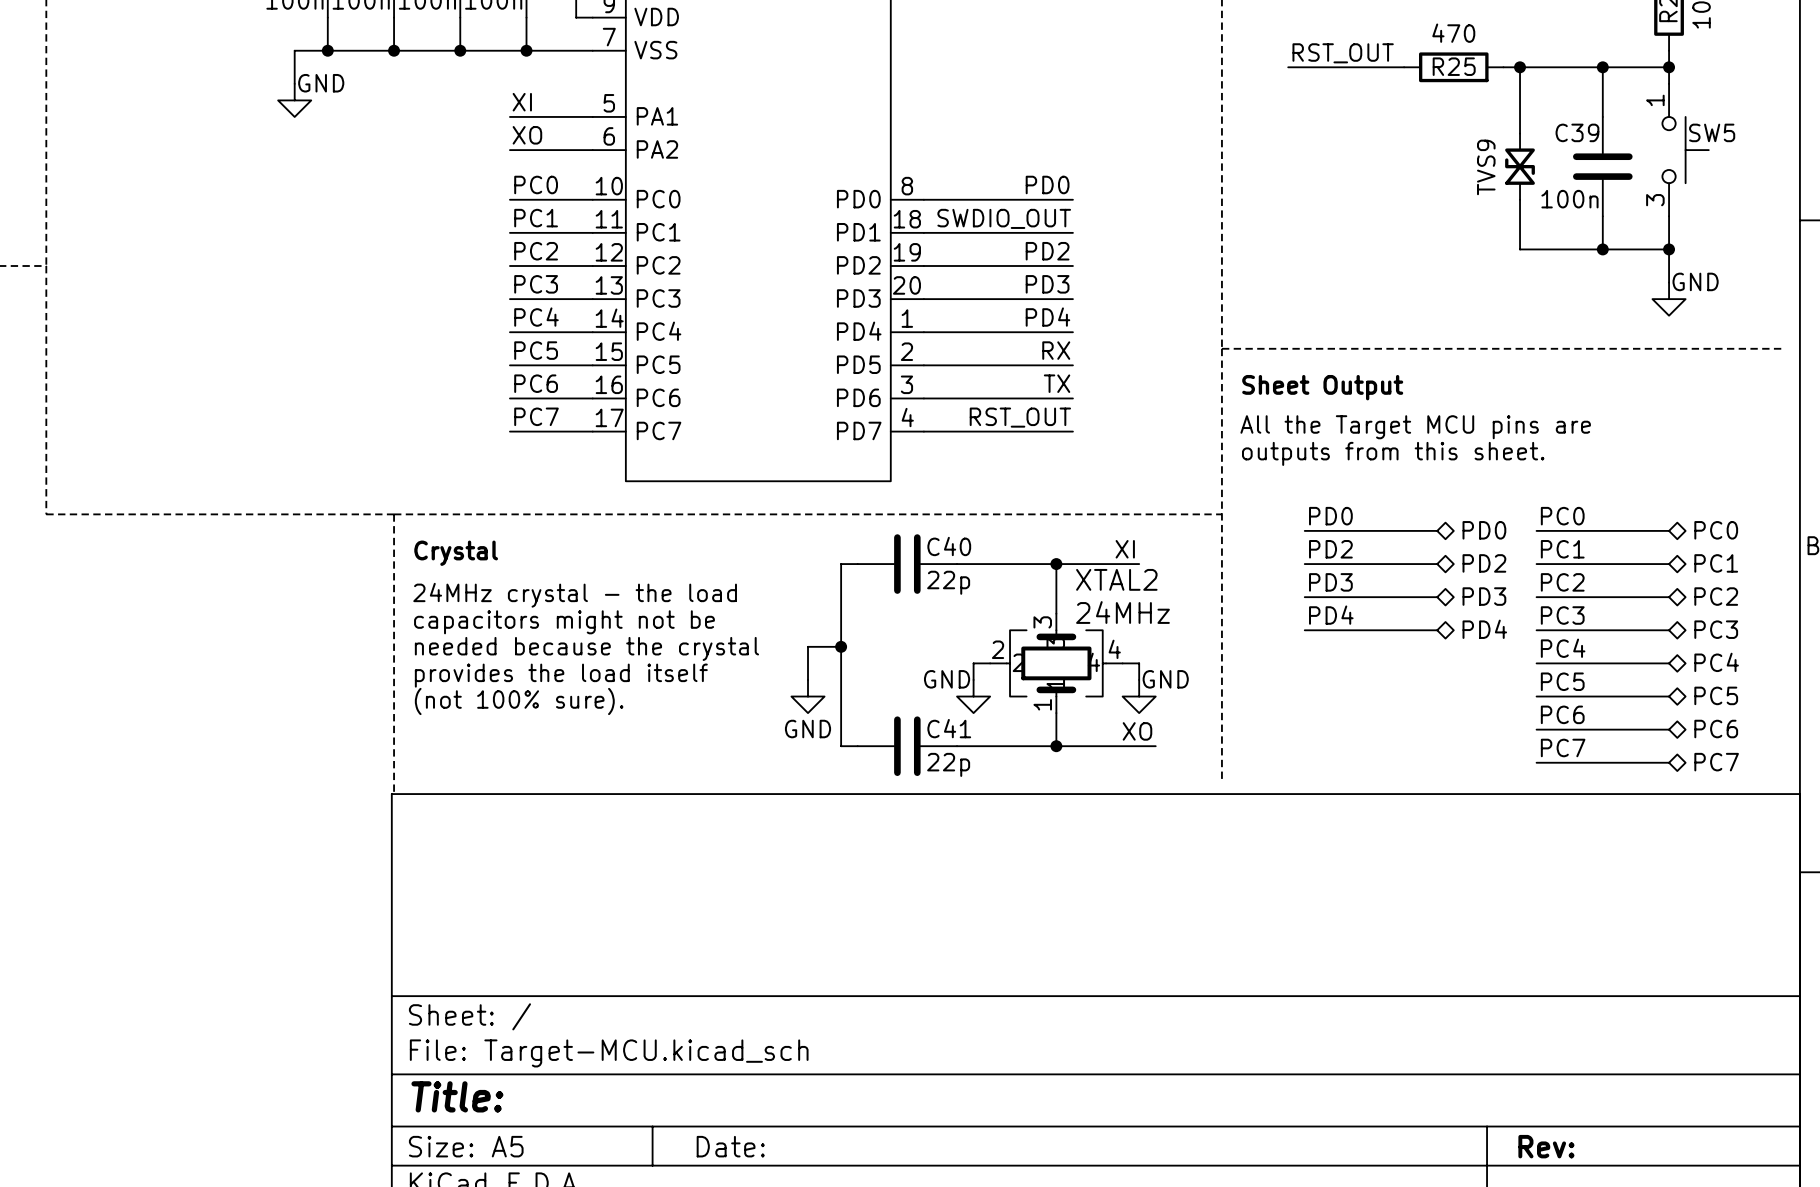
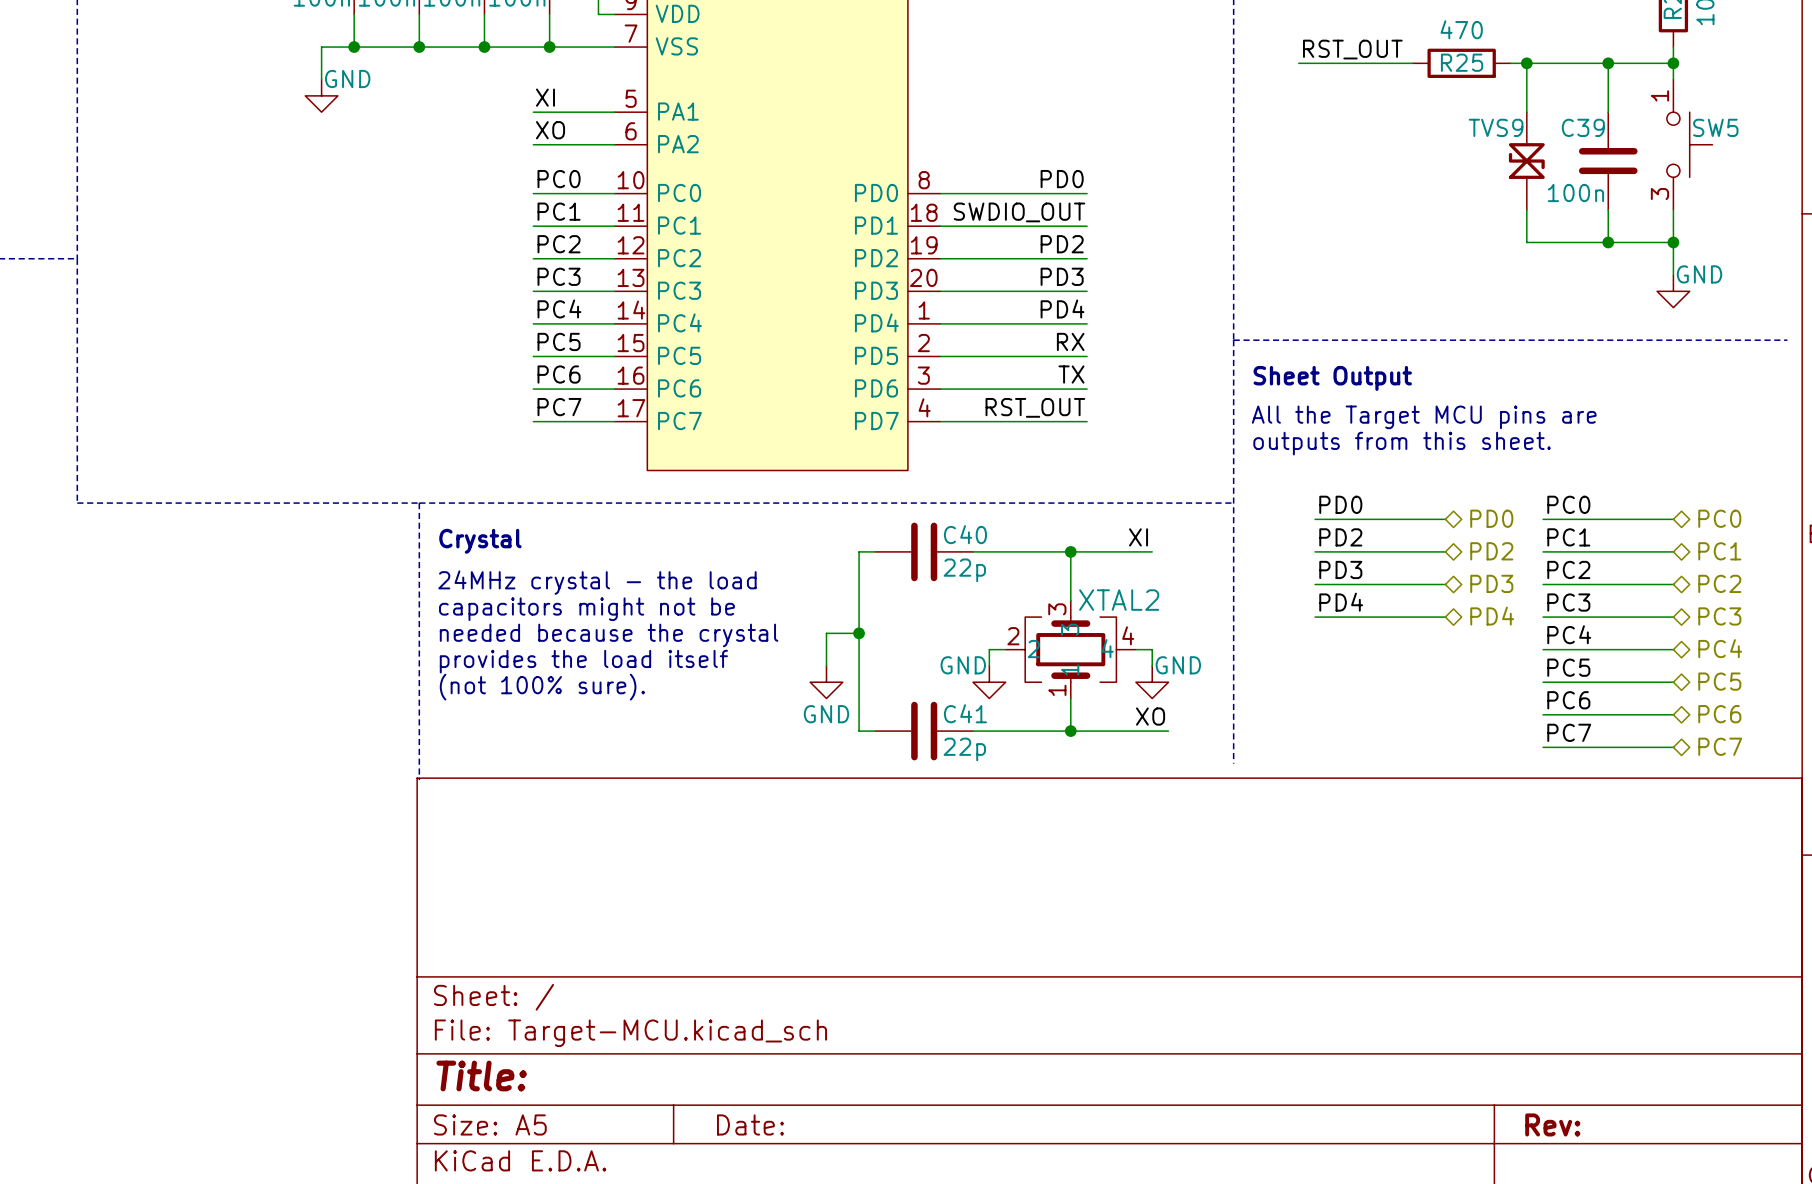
TVS9 symbol: [1505, 133, 1535, 200] -> [1508, 112, 1545, 210]
TVS9 name position: TVS9 (1486, 167) -> TVS9 (1496, 127)
XTAL2 name position: XTAL2 (1116, 579) -> XTAL2 (1119, 600)
XTAL2 value: 24MHz (1122, 612) -> none

